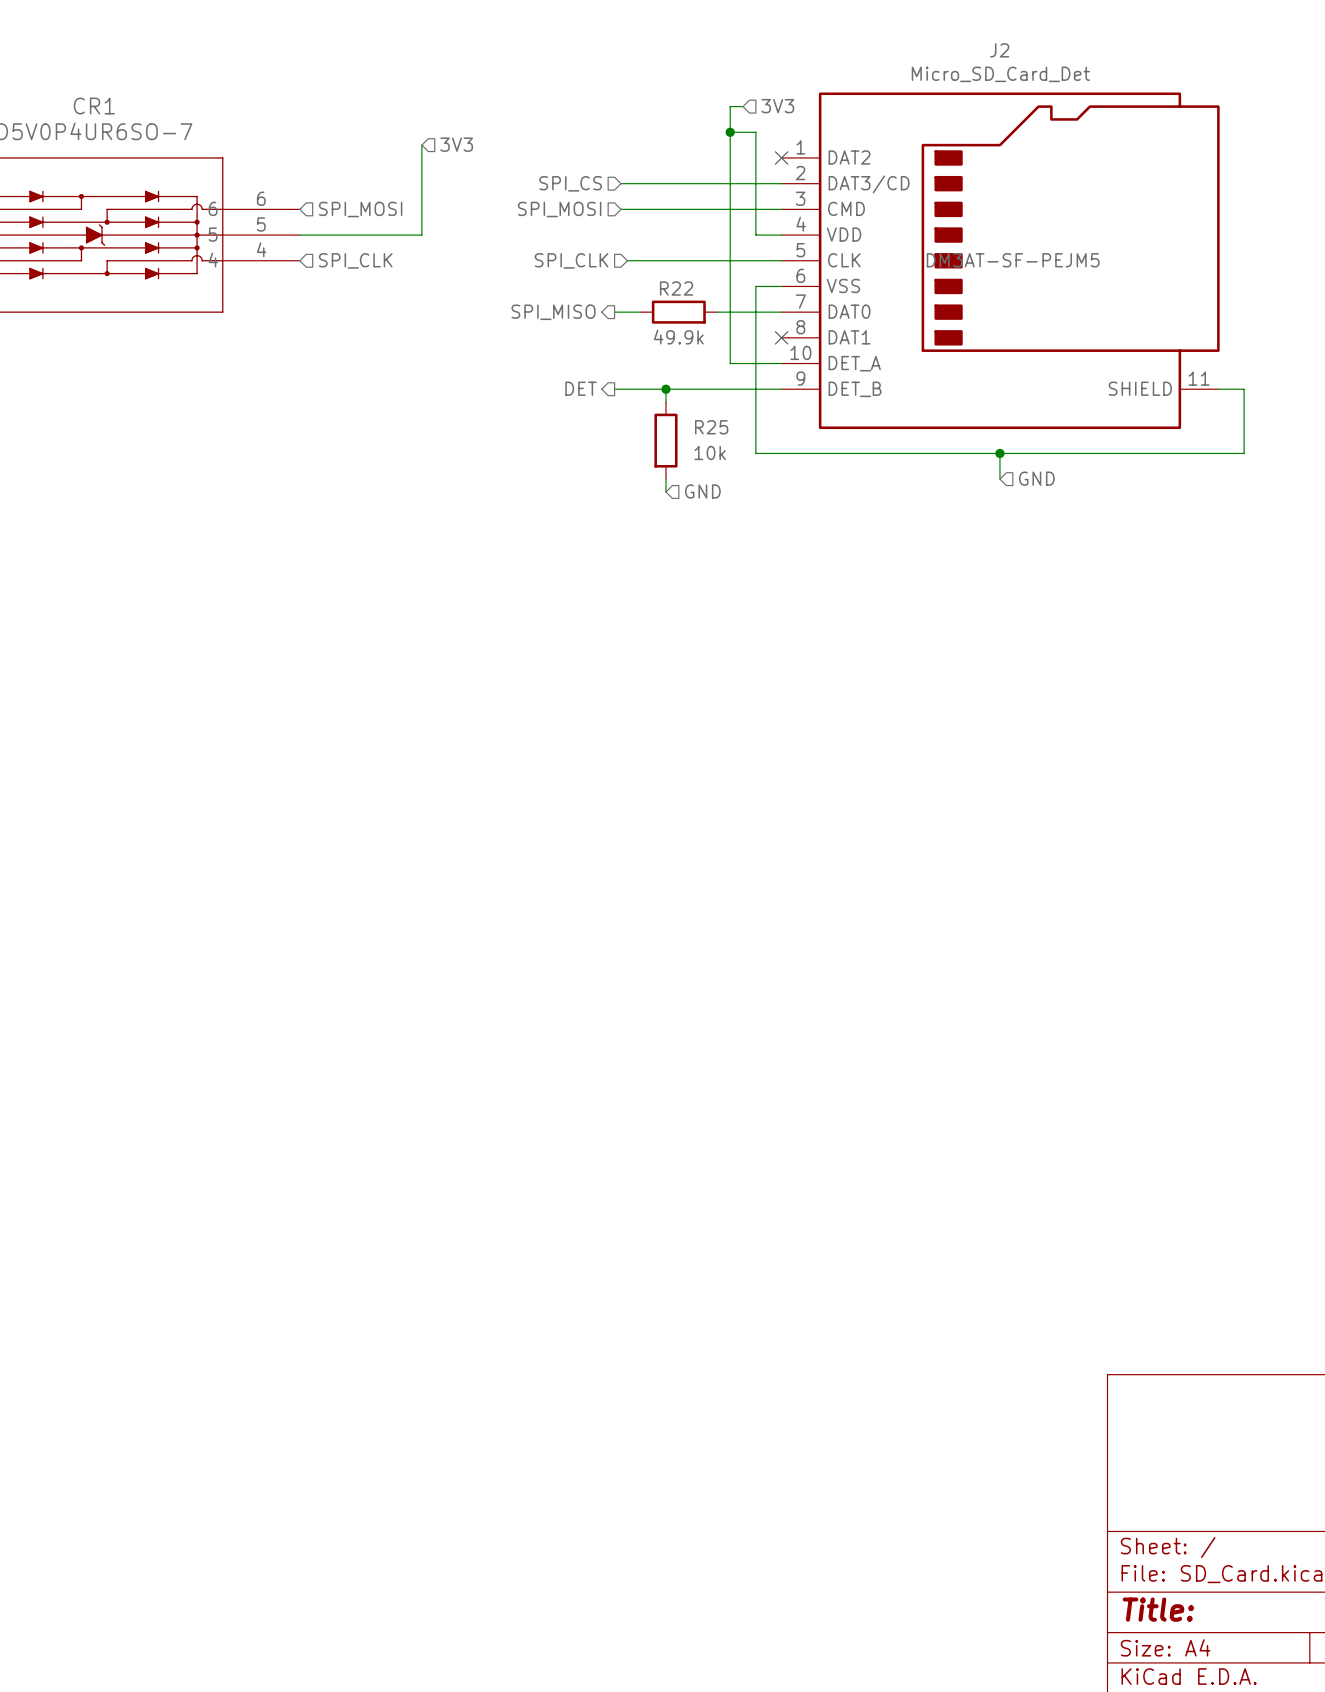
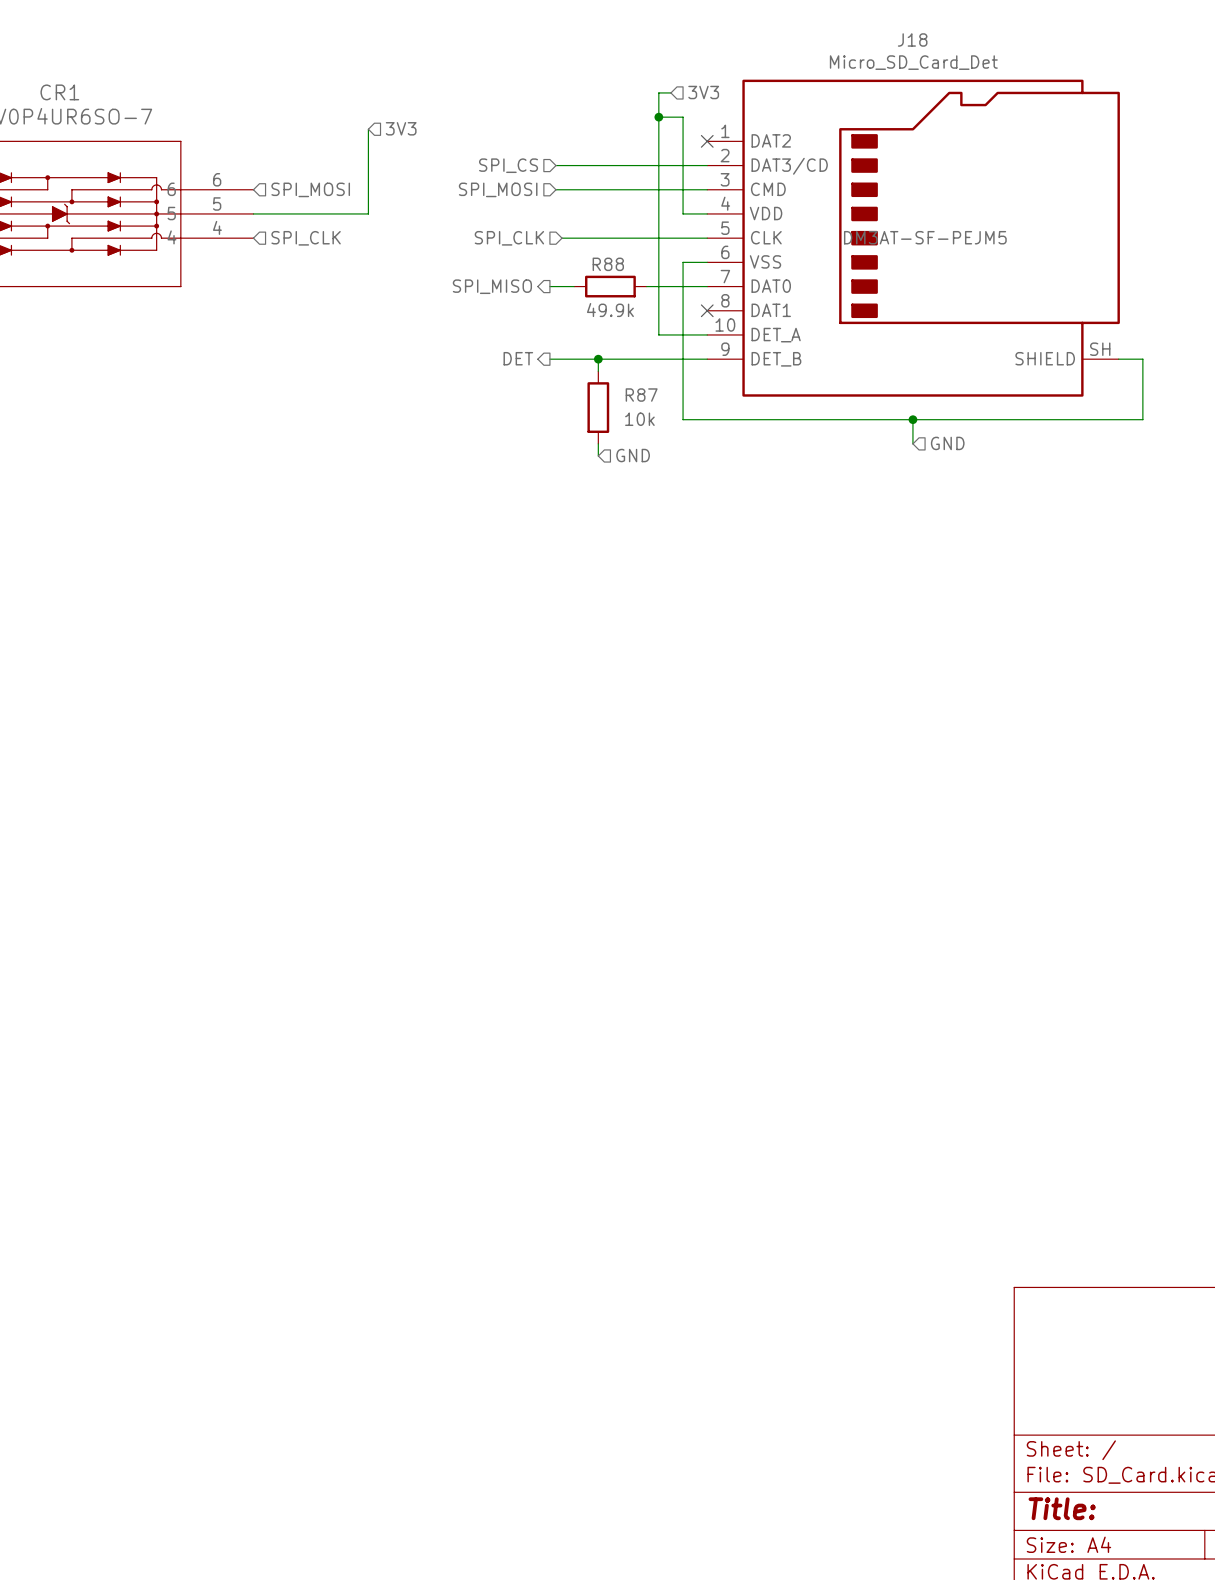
J2 name: J2 (999, 50) -> J18 (912, 39)
R22 name: R22 (676, 288) -> R88 (608, 264)
J2 pin number: 11 (1199, 378) -> SH (1100, 349)
R25 name: R25 (711, 427) -> R87 (641, 395)

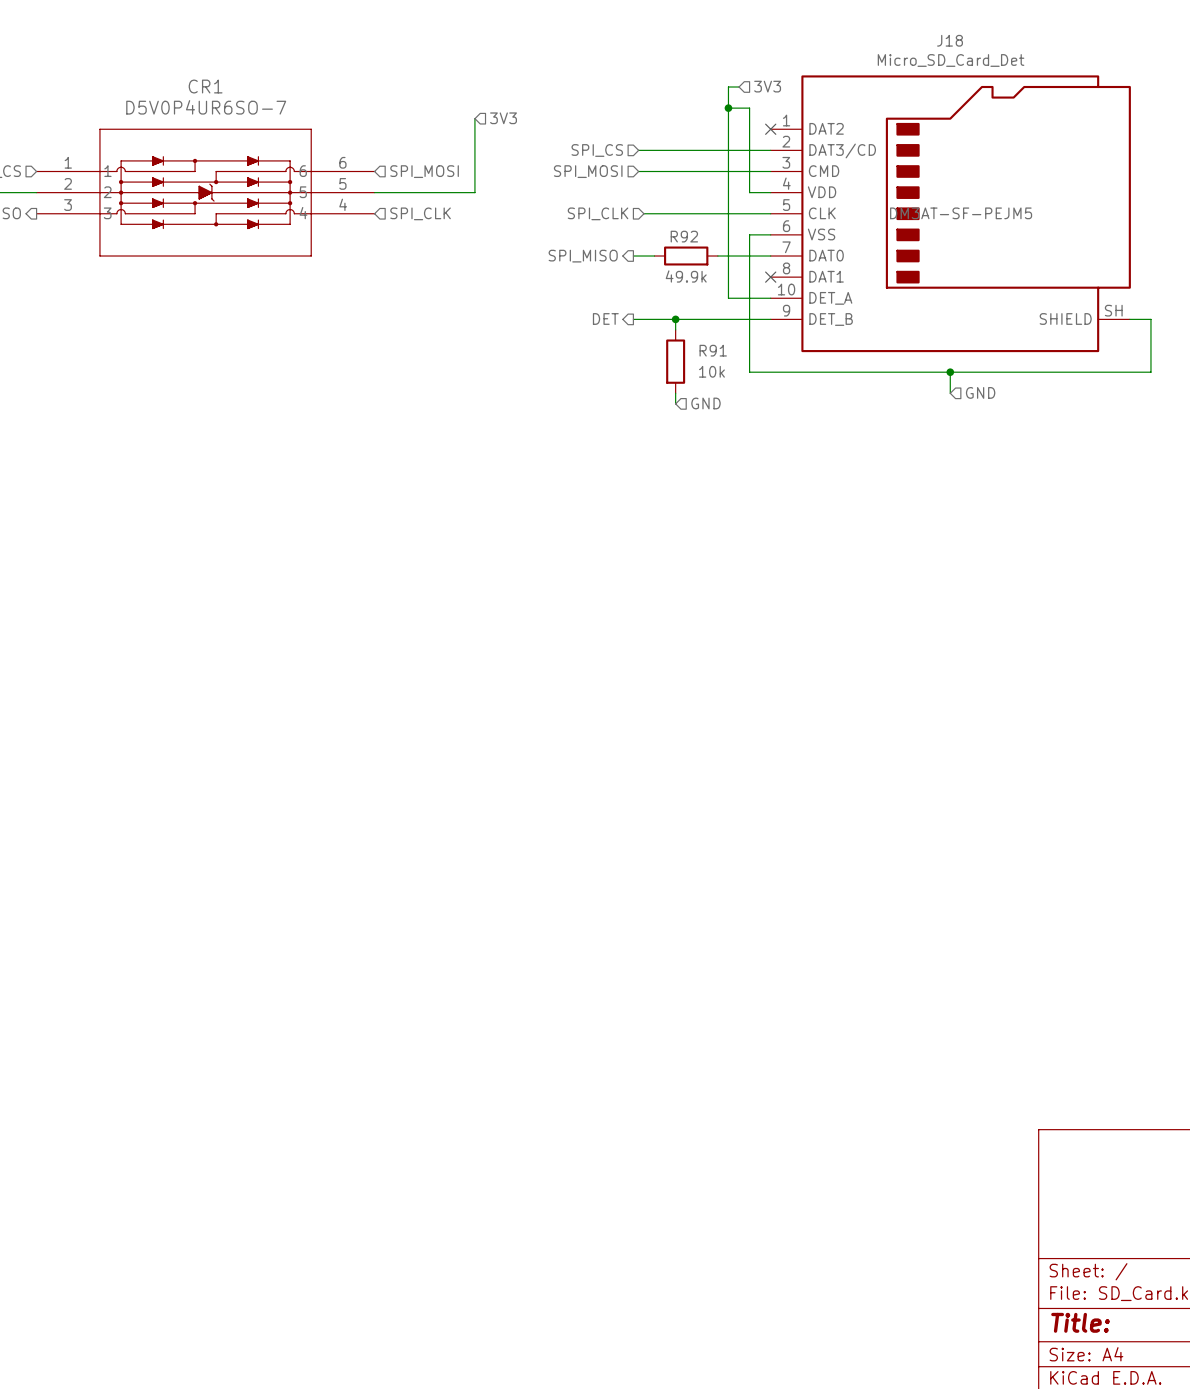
R88 name: R88 (608, 264) -> R92 (684, 236)
R87 name: R87 (641, 395) -> R91 (713, 350)

